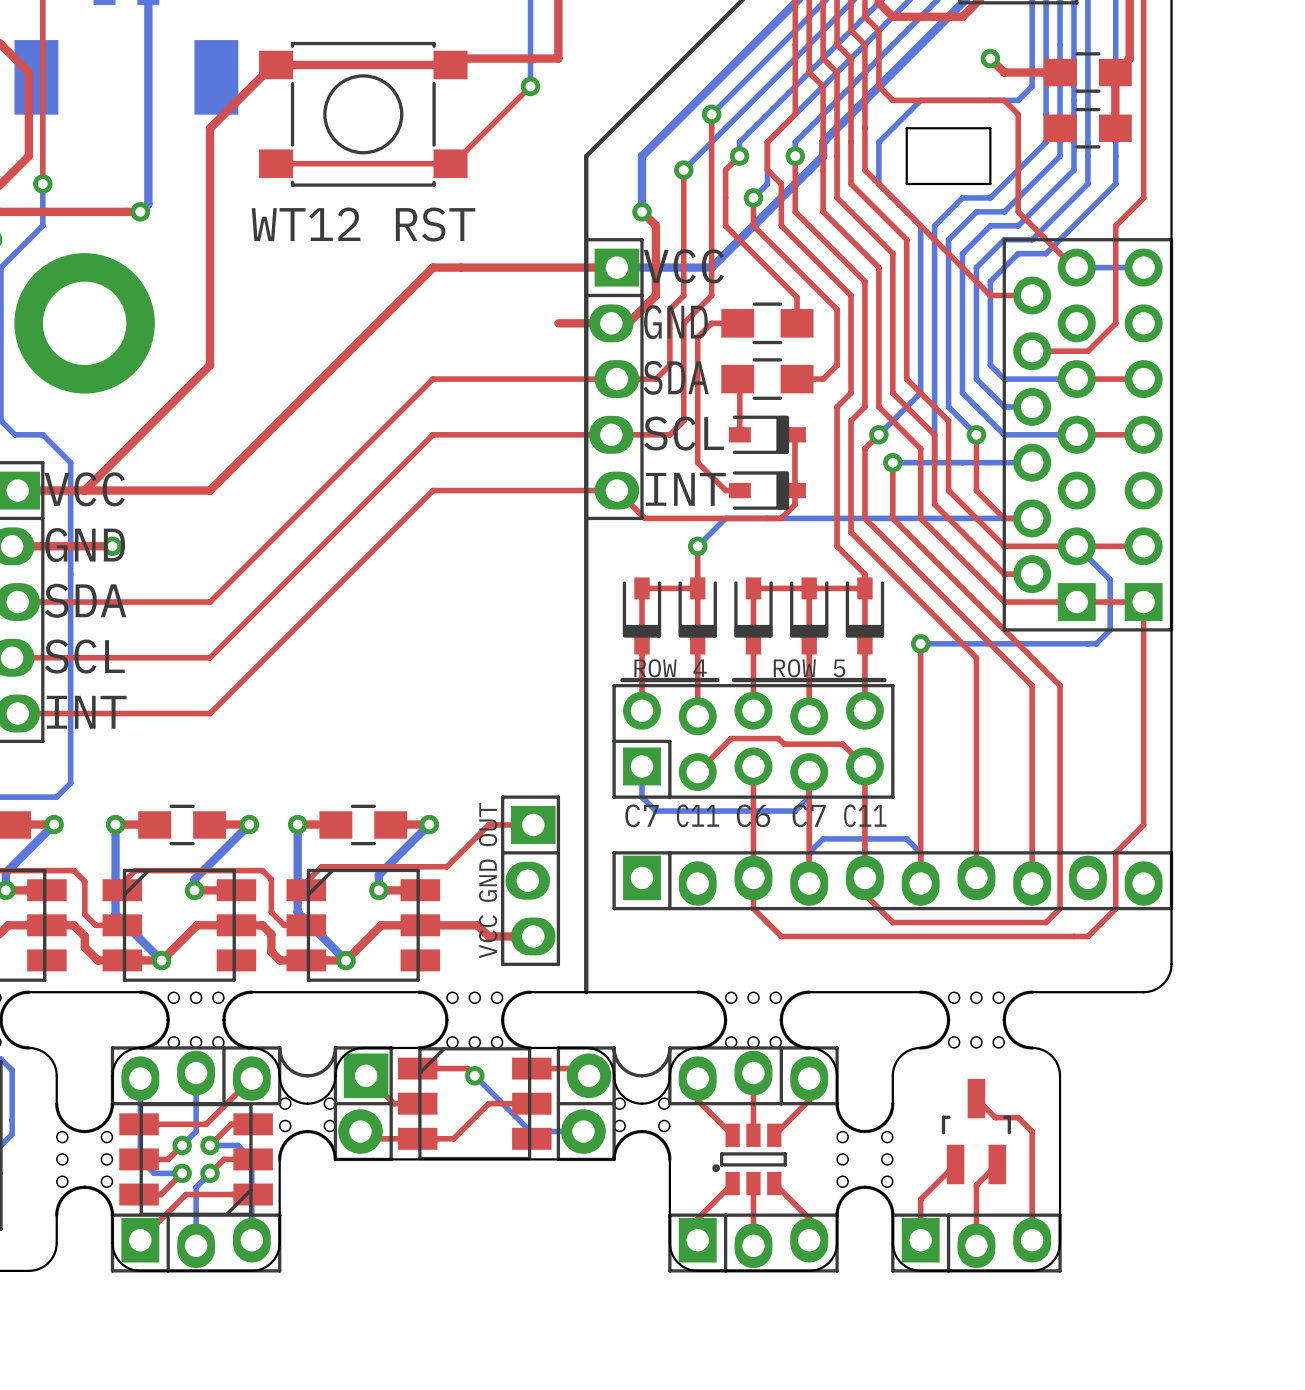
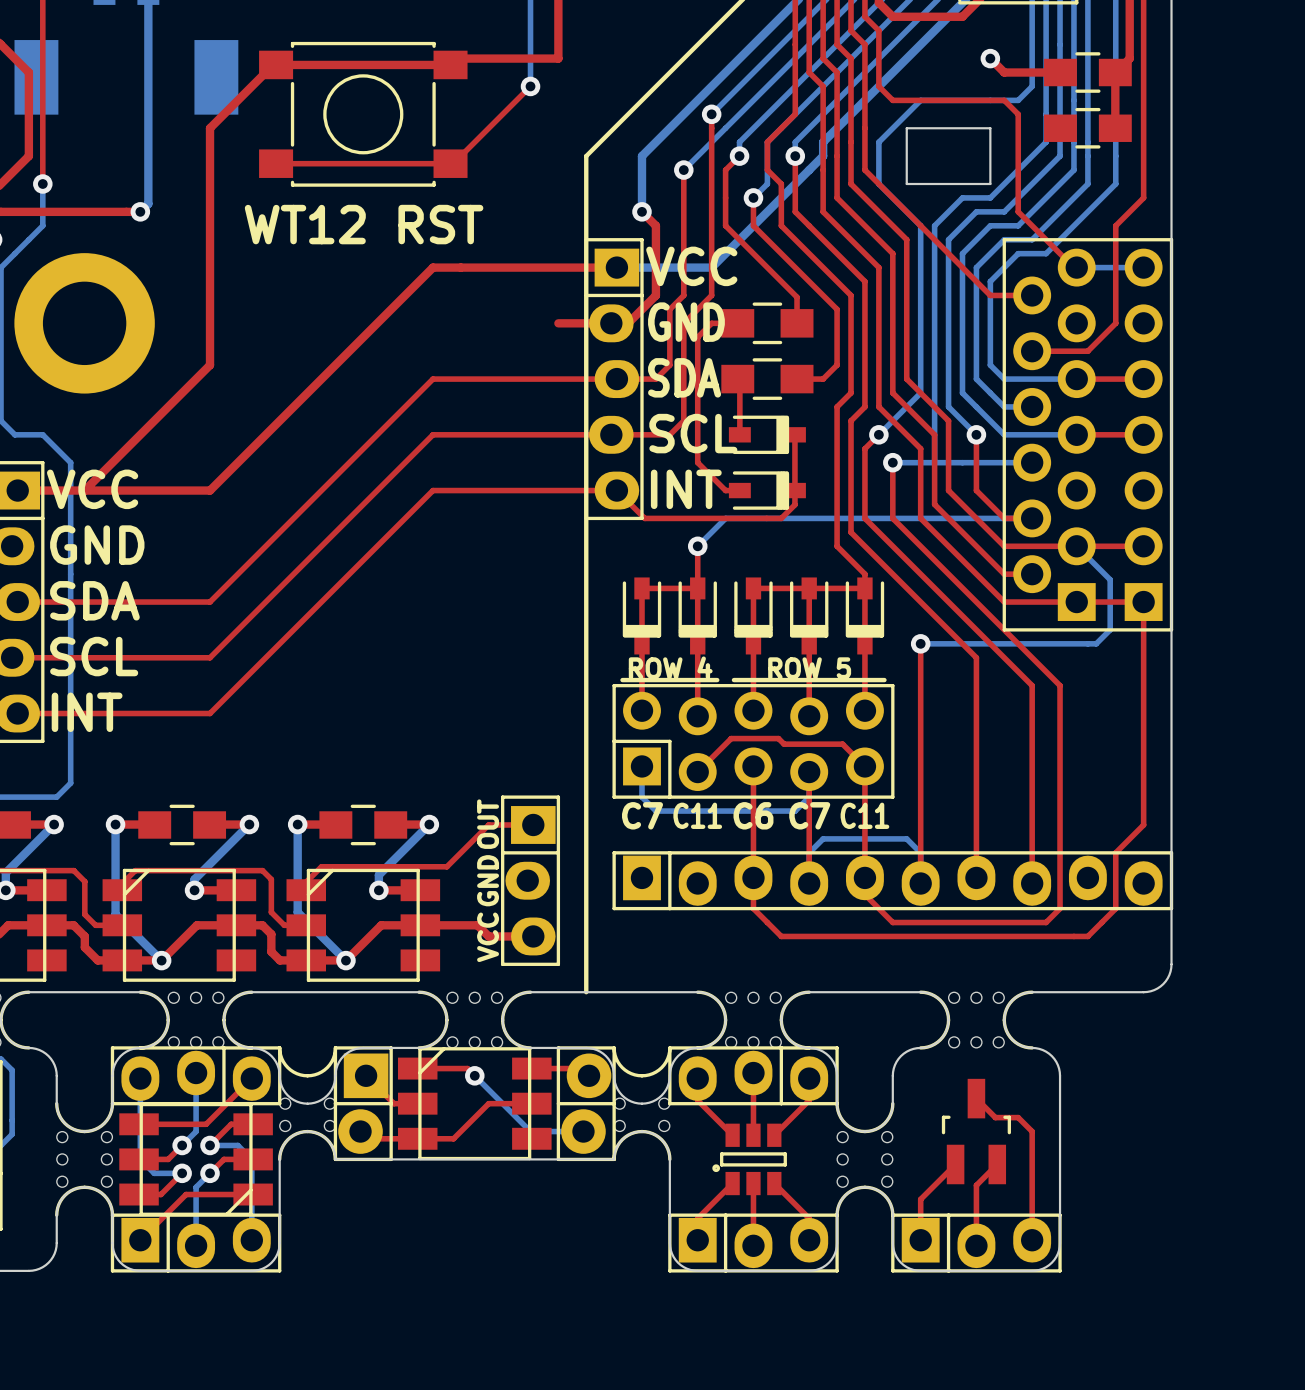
top track: (12, 546) (112, 546) -> none
via: (112, 546) -> none

